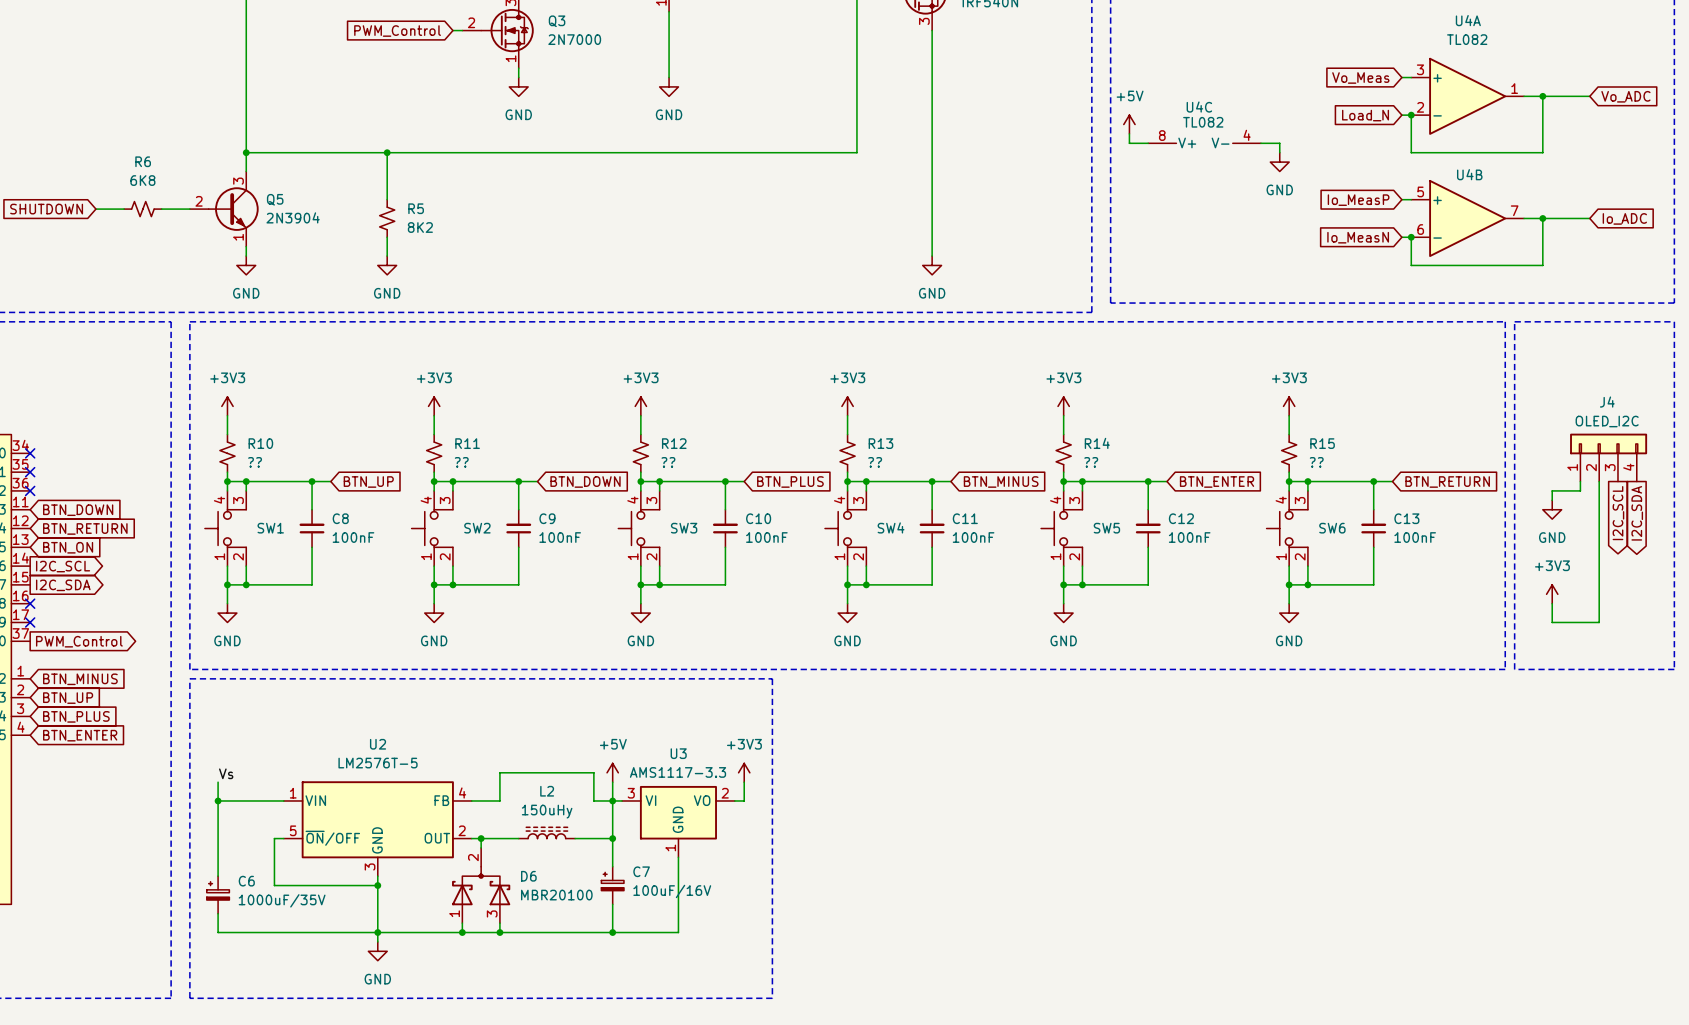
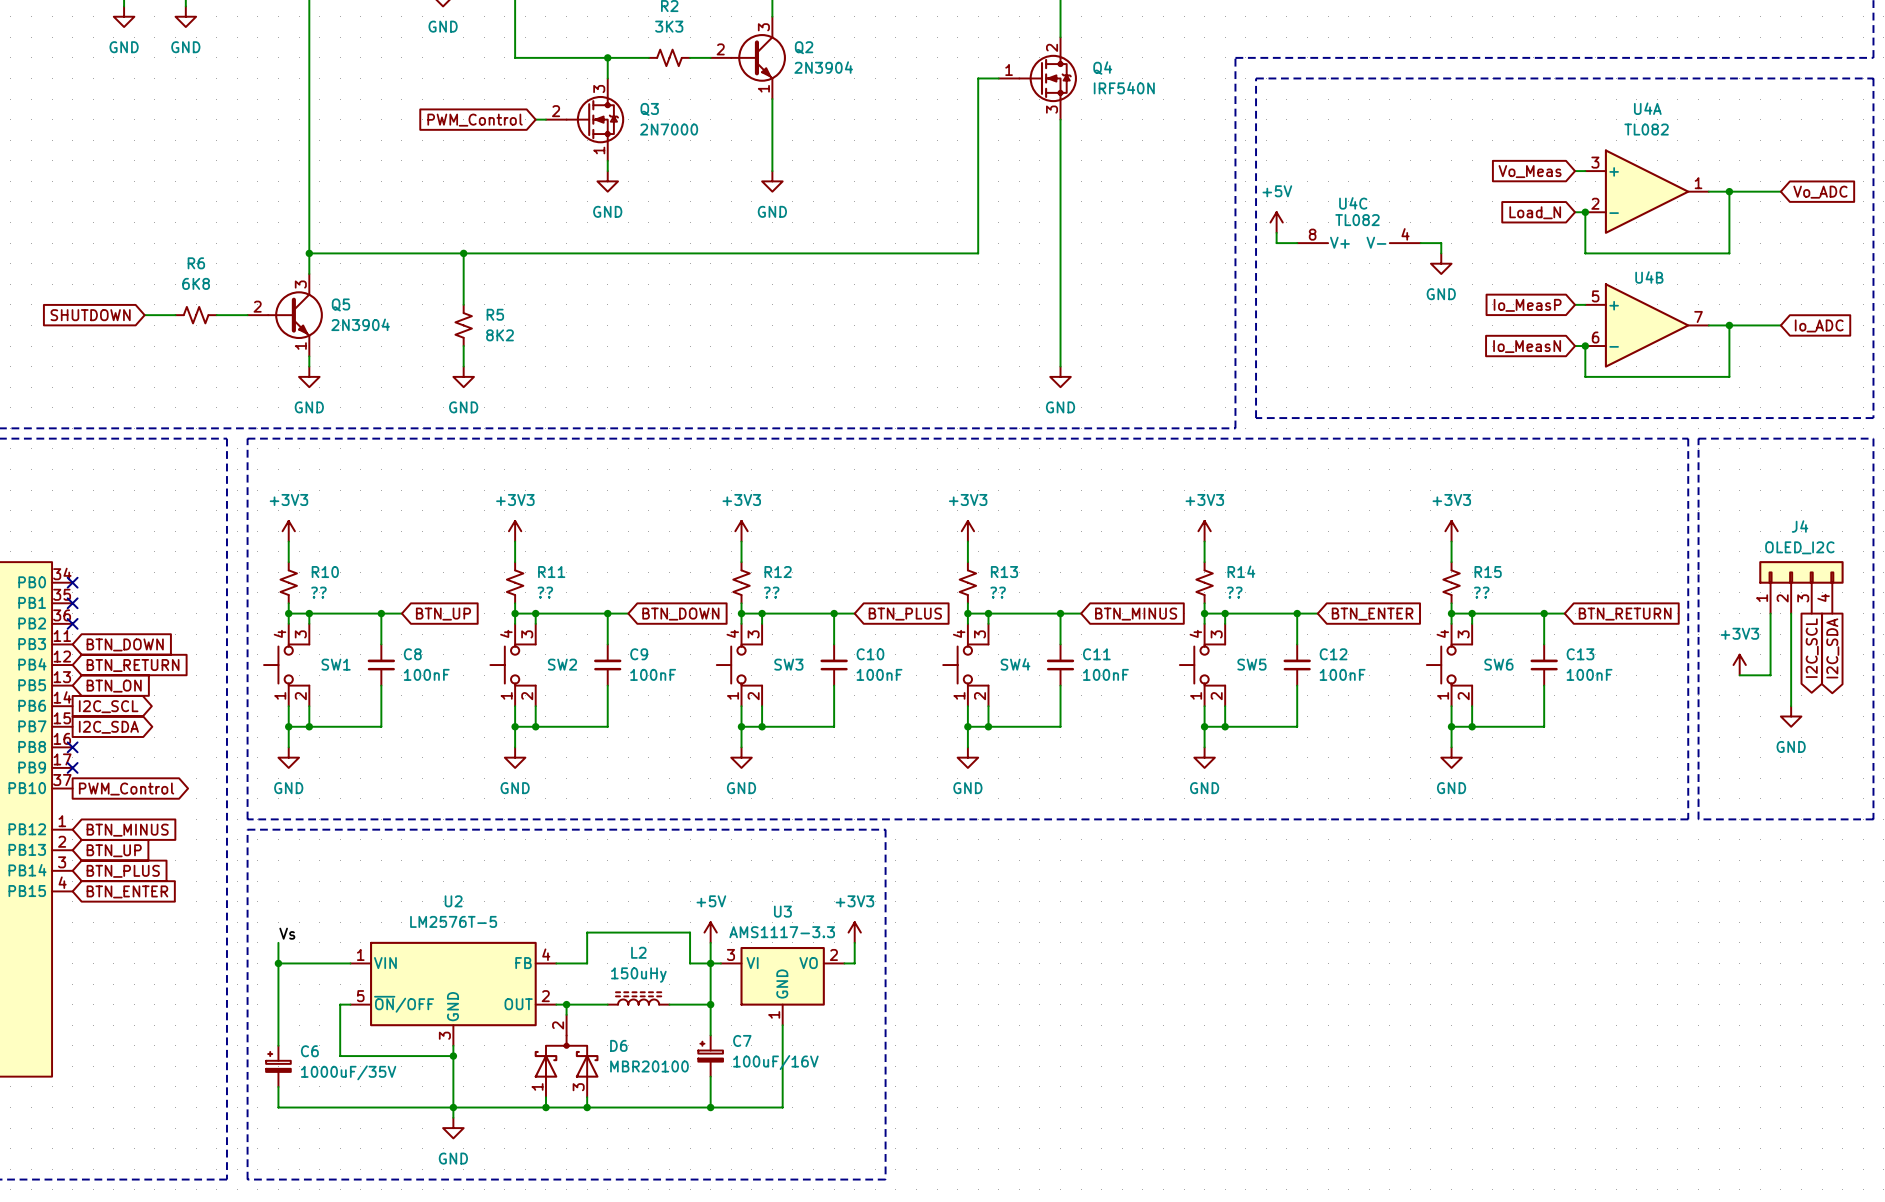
wire: (1580, 490) (1552, 490) (1552, 500) -> (1770, 623) (1770, 675) (1739, 675)
power symbol position: GND (1552, 509) -> GND (1791, 716)
wire: (1599, 566) (1599, 622) (1552, 622) (1552, 603) -> none
power symbol position: +3V3 (1552, 594) -> +3V3 (1739, 665)

